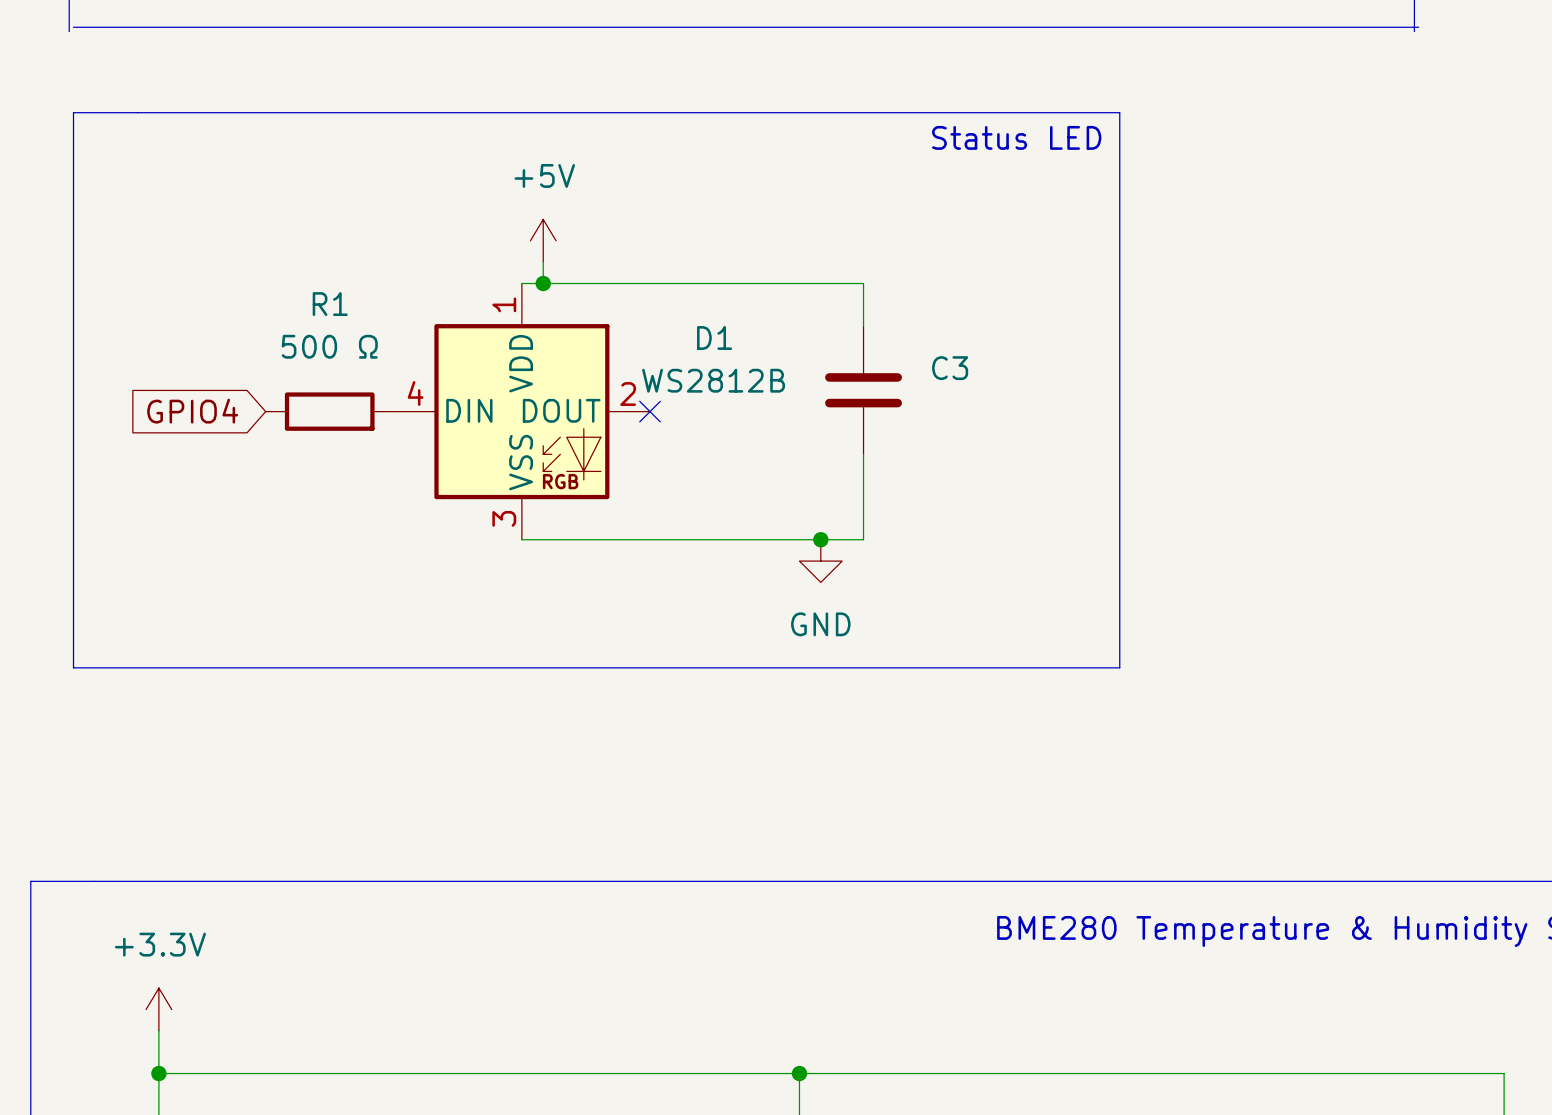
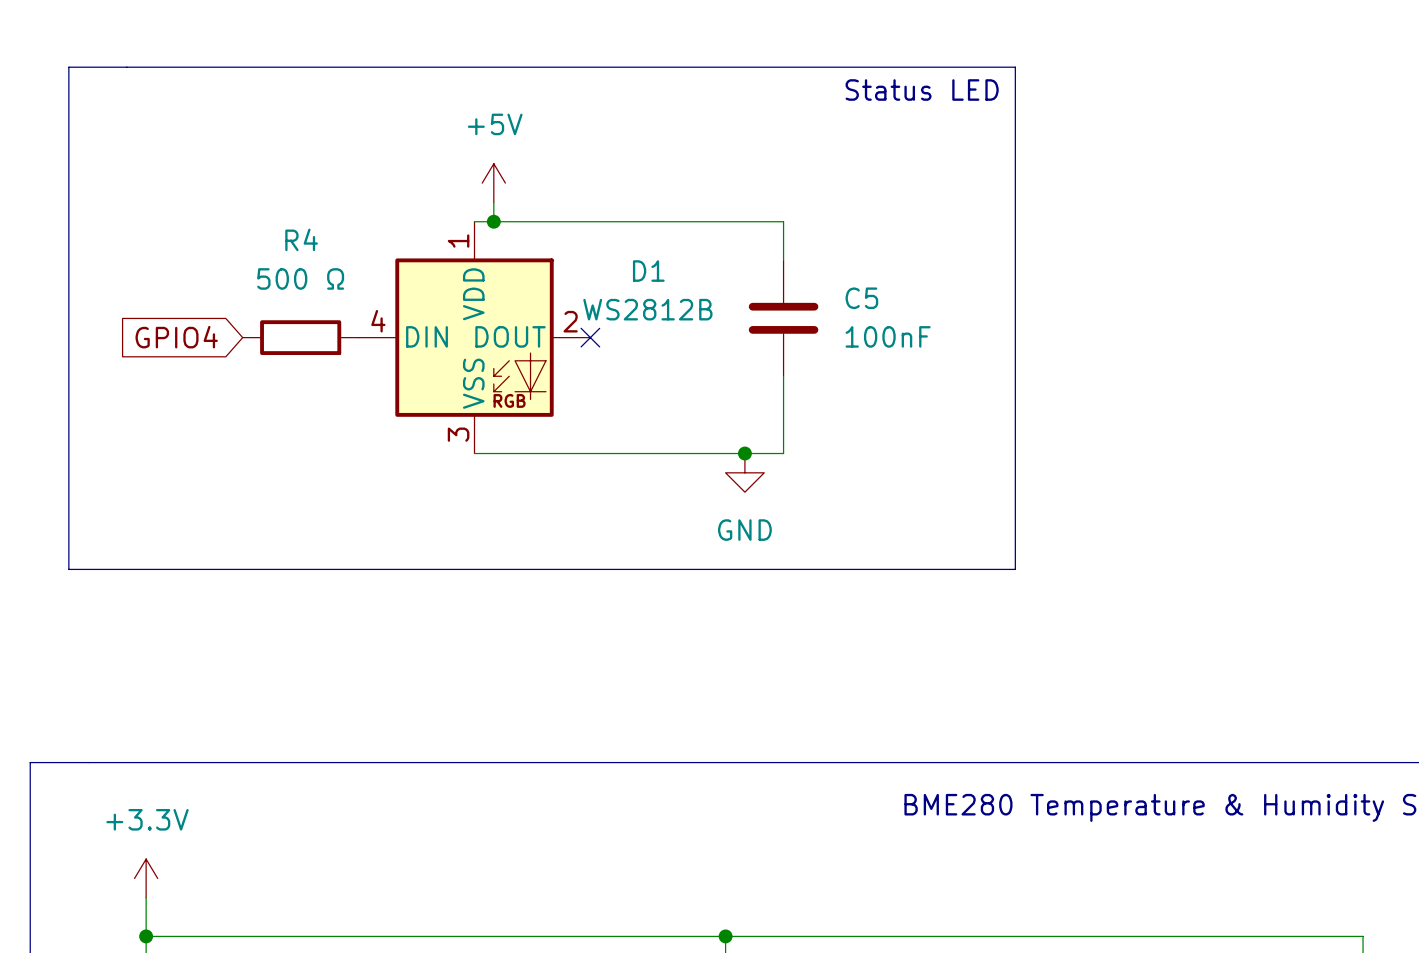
R1 name: R1 (330, 304) -> R4 (301, 239)
C3 name: C3 (950, 368) -> C5 (861, 298)
C3 value: none -> 100nF (888, 336)

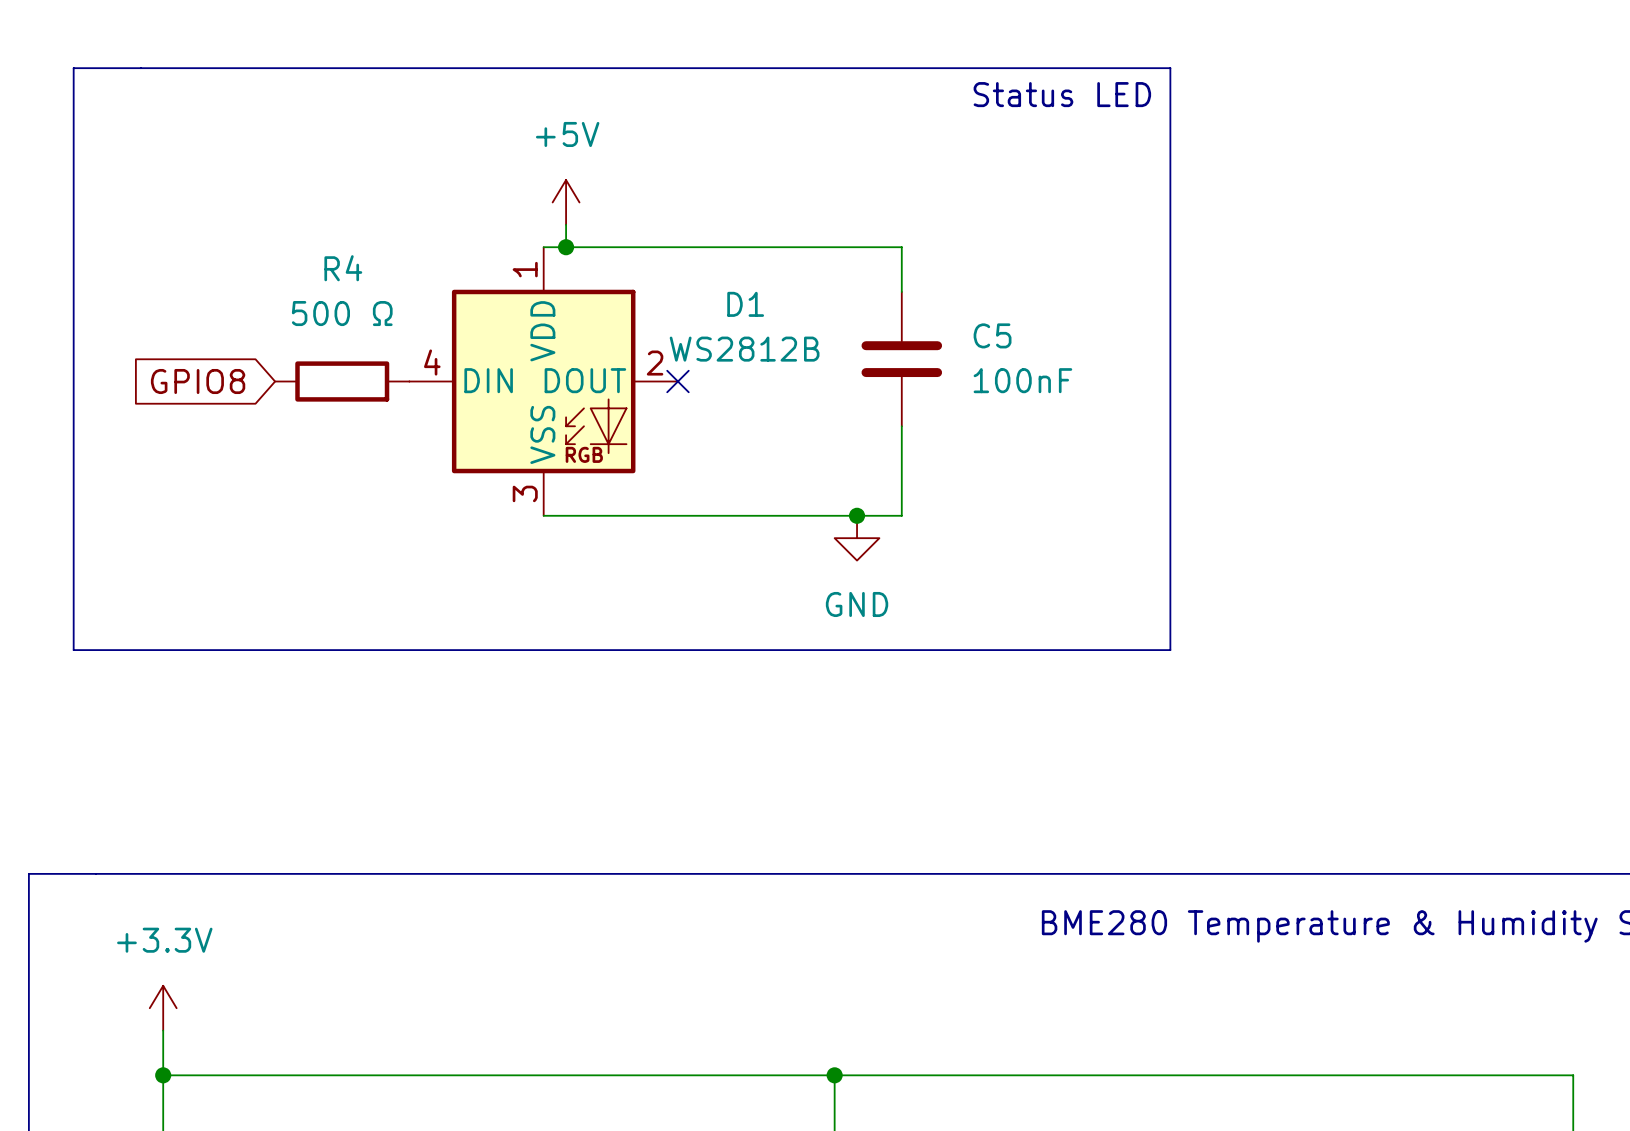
global label: GPIO4 (176, 337) -> GPIO8 (198, 381)

